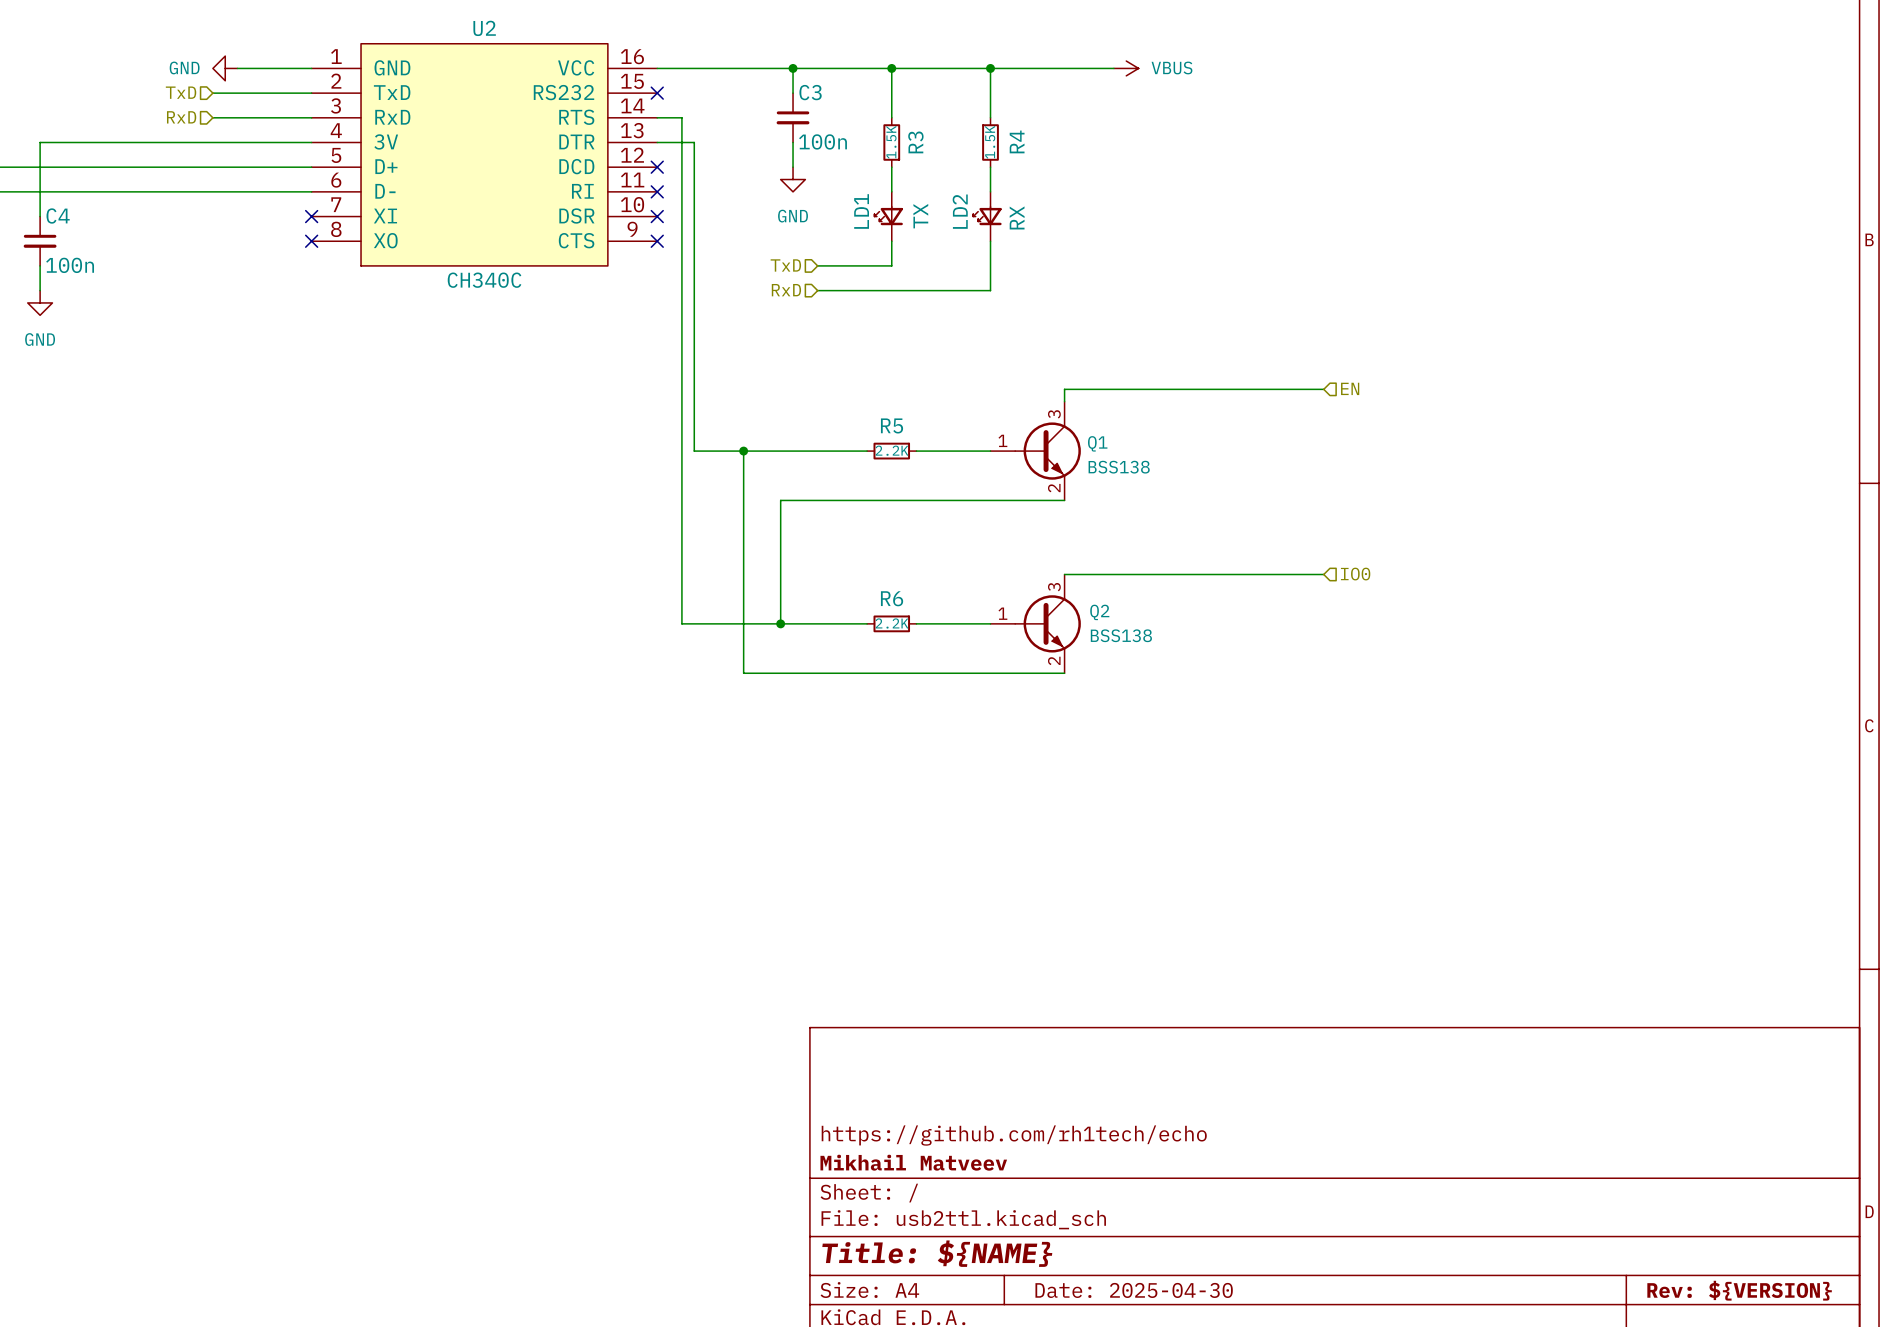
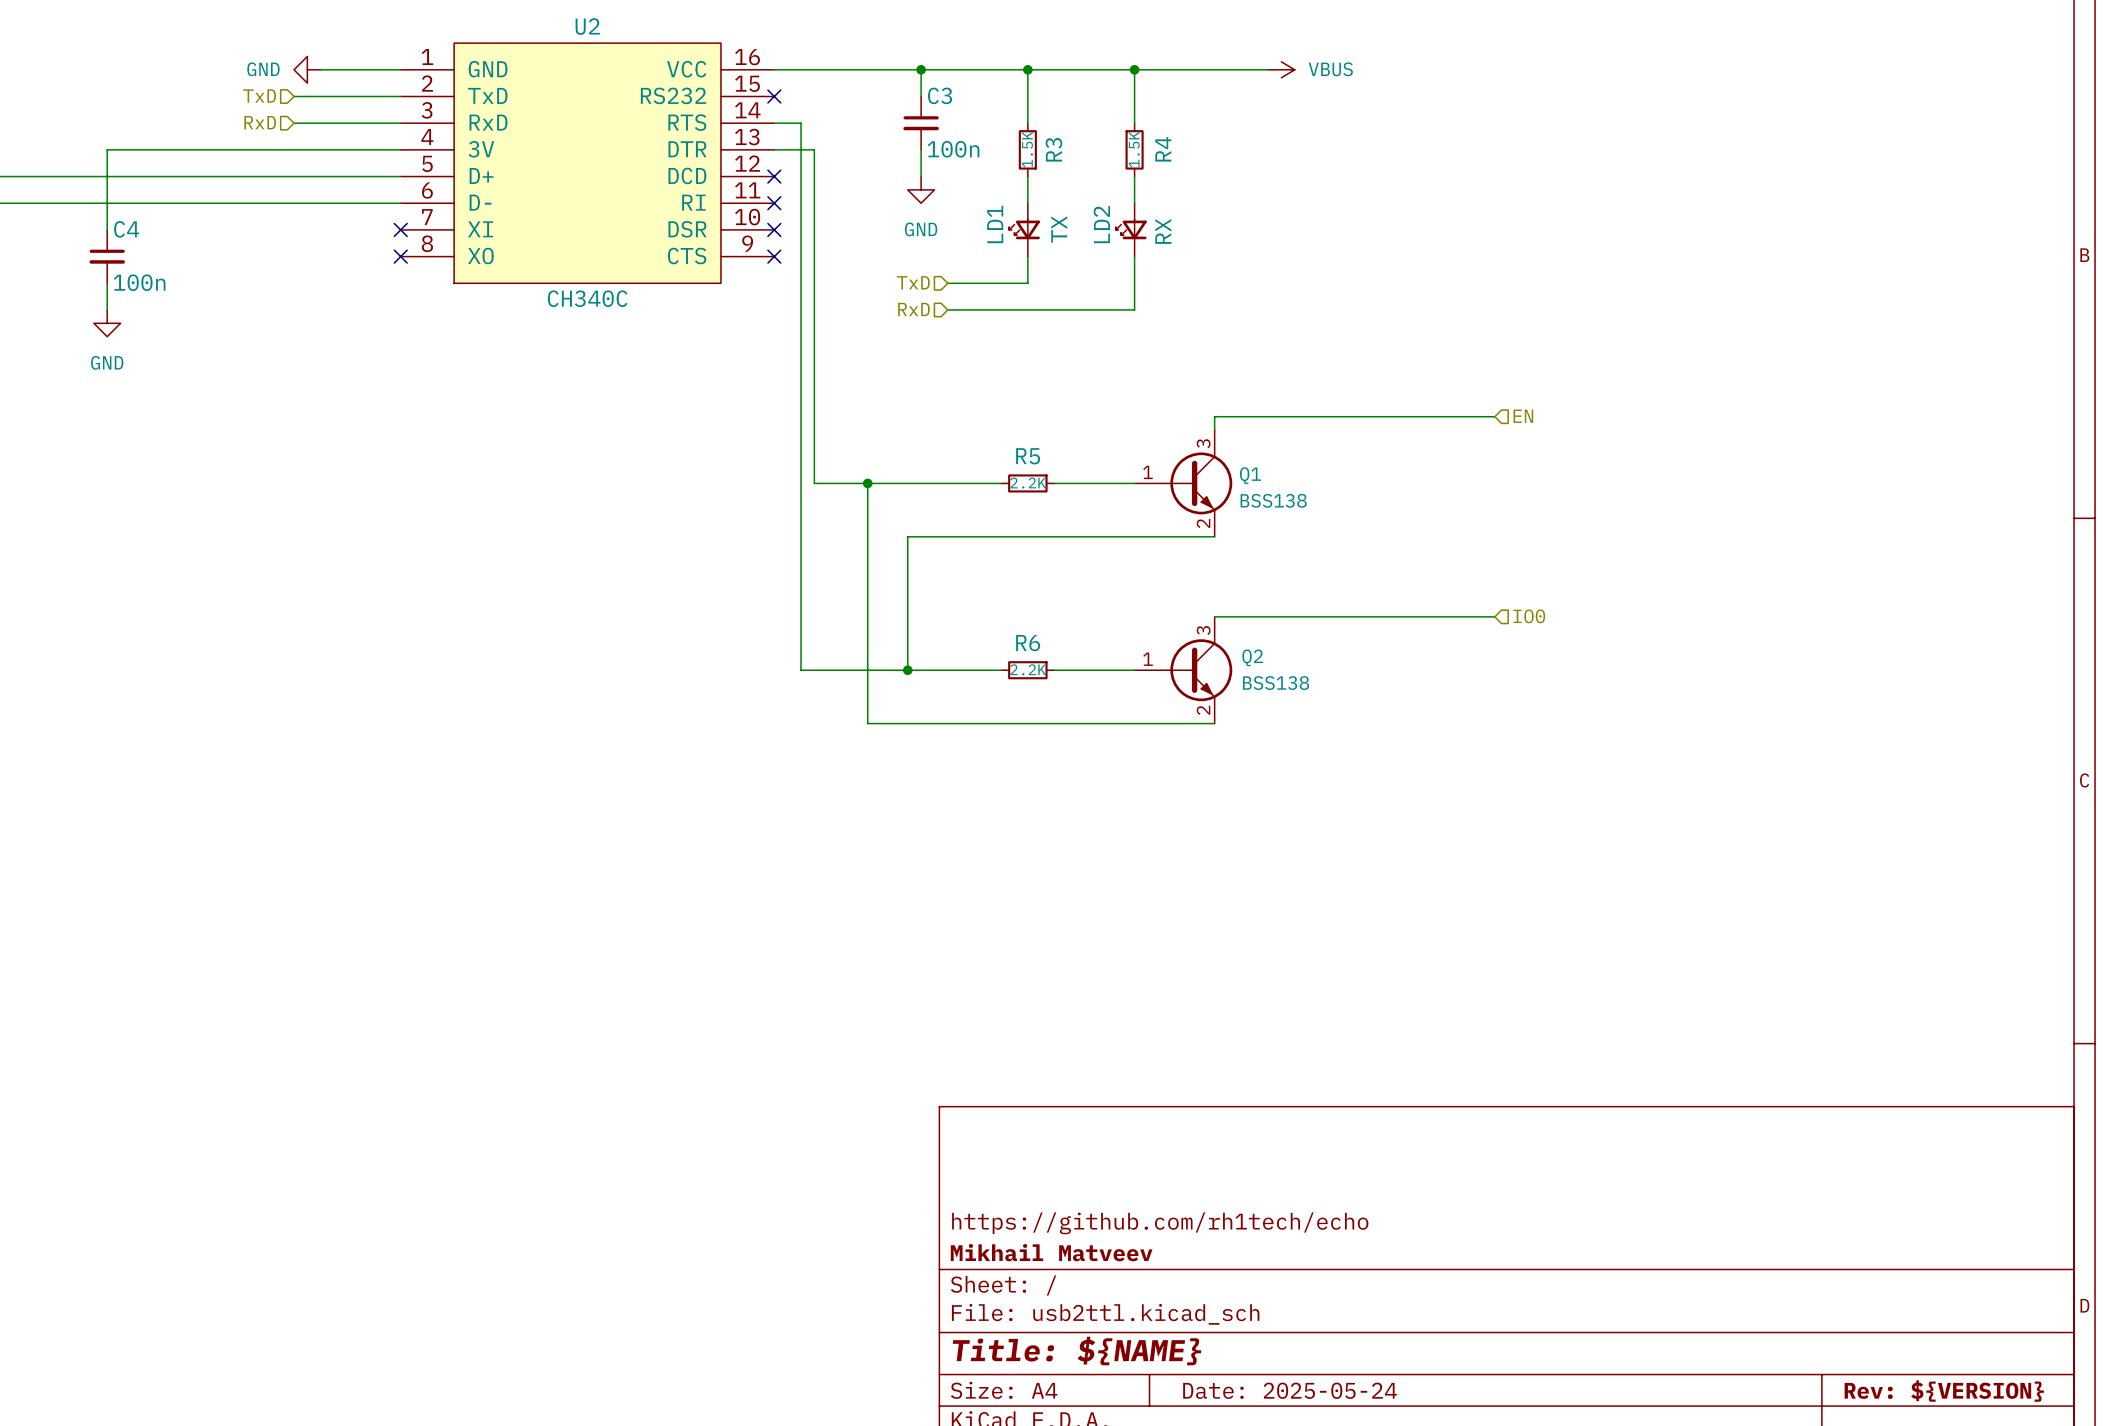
title block: Date: 2025-04-30 (1134, 1290) -> Date: 2025-05-24 (1290, 1390)

